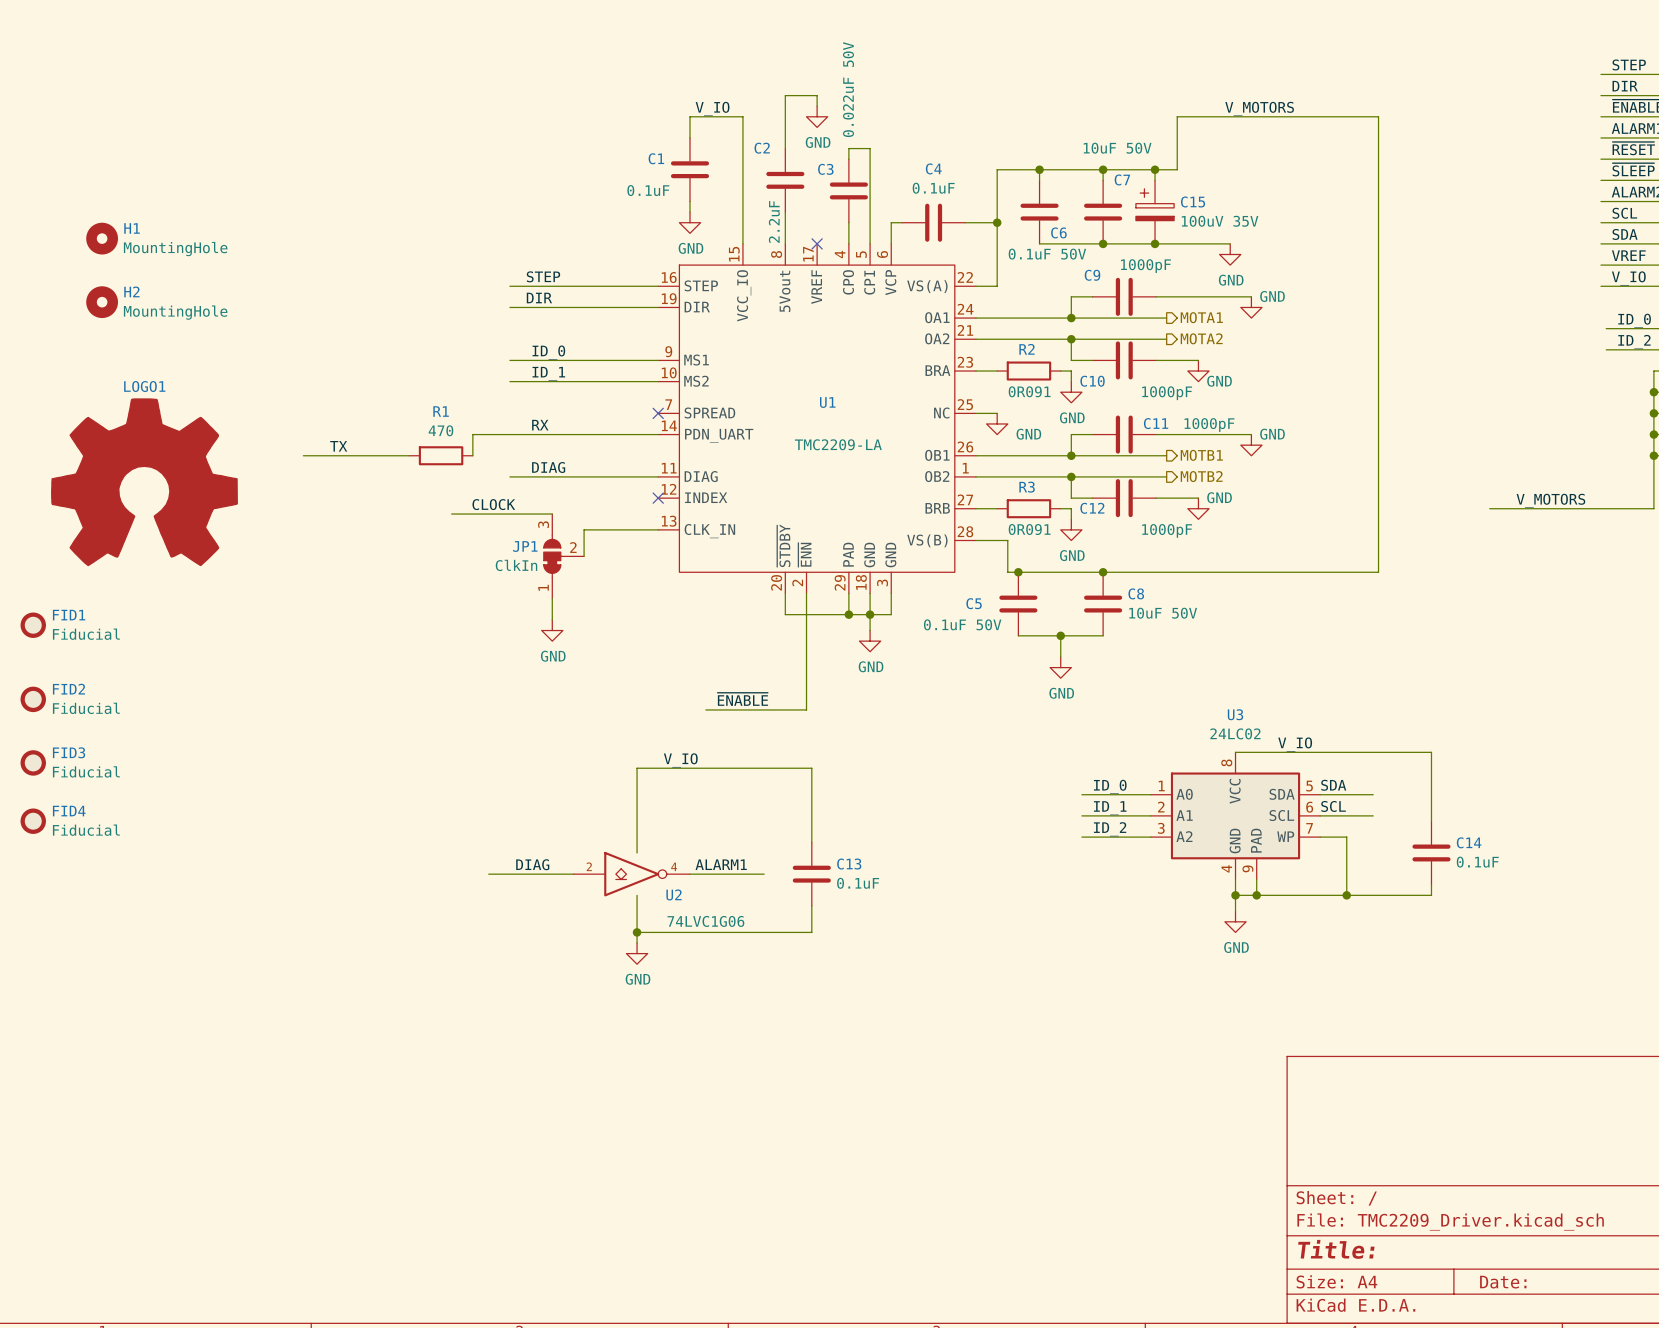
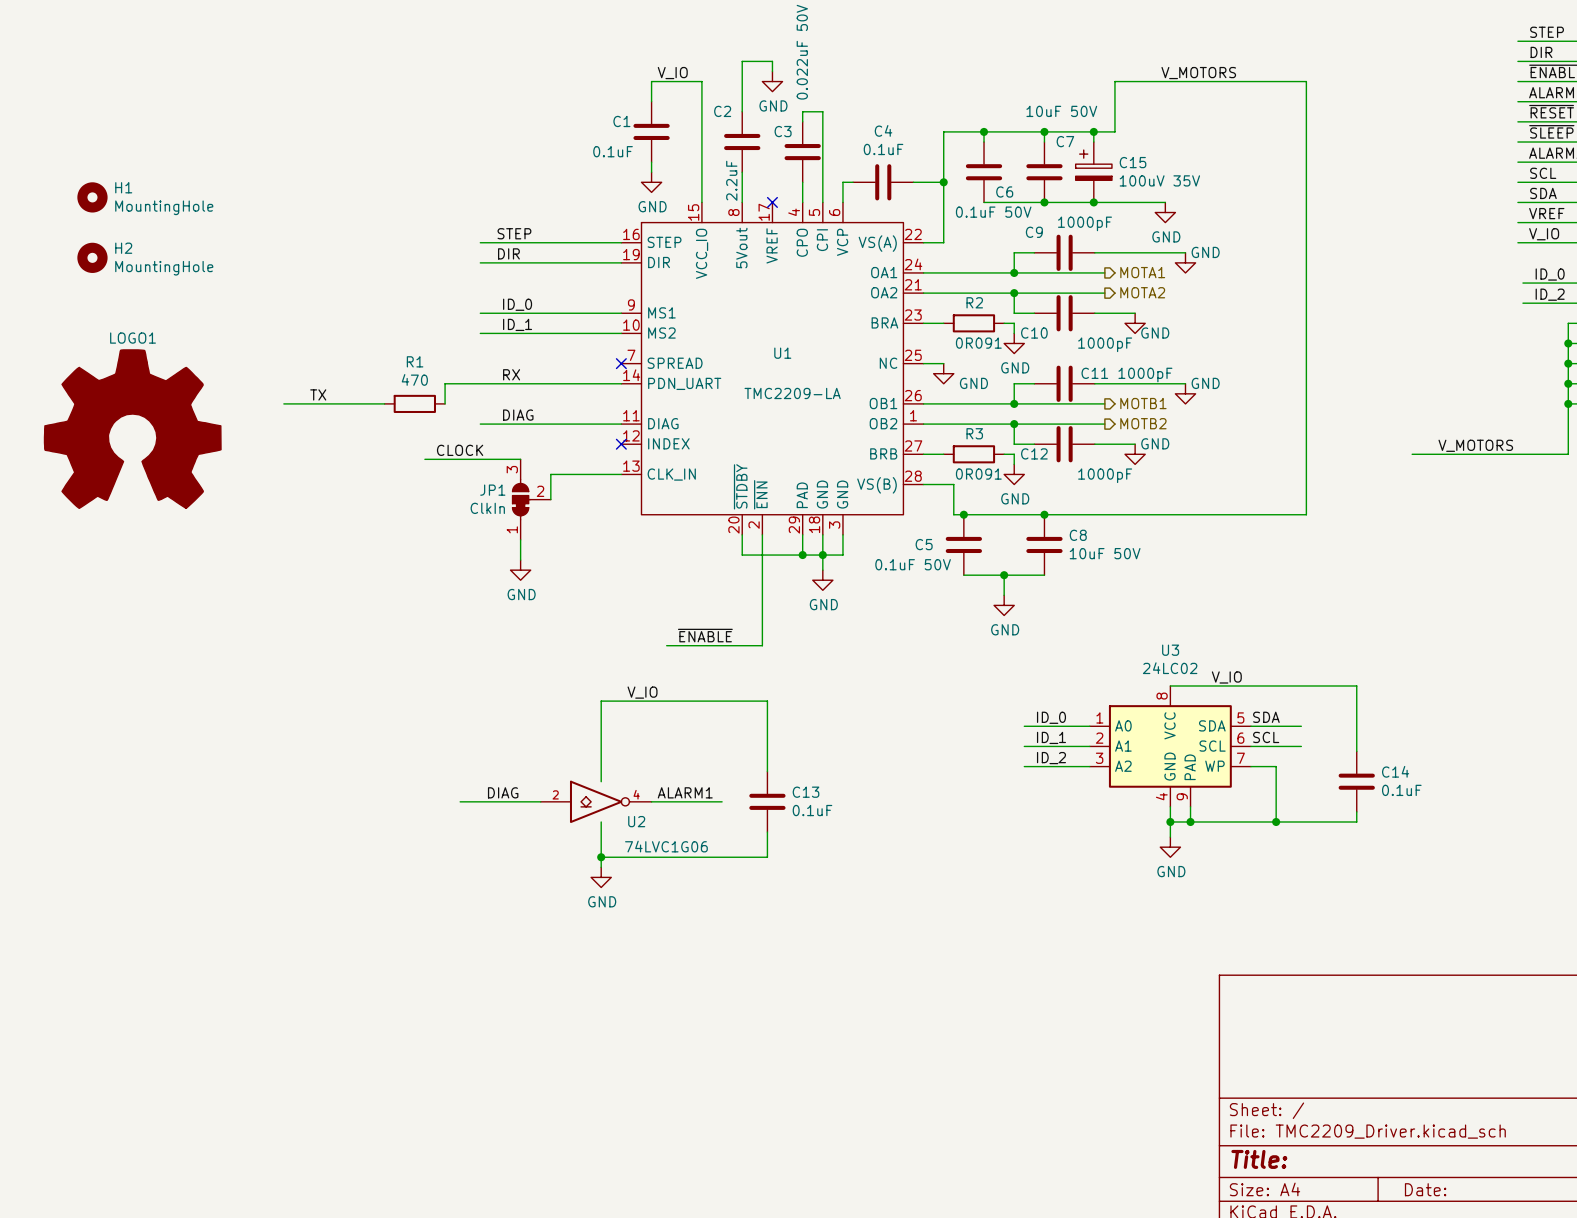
FID1: Fiducial (33, 625) -> none
FID2: Fiducial (33, 699) -> none
FID3: Fiducial (33, 762) -> none
FID4: Fiducial (33, 821) -> none

